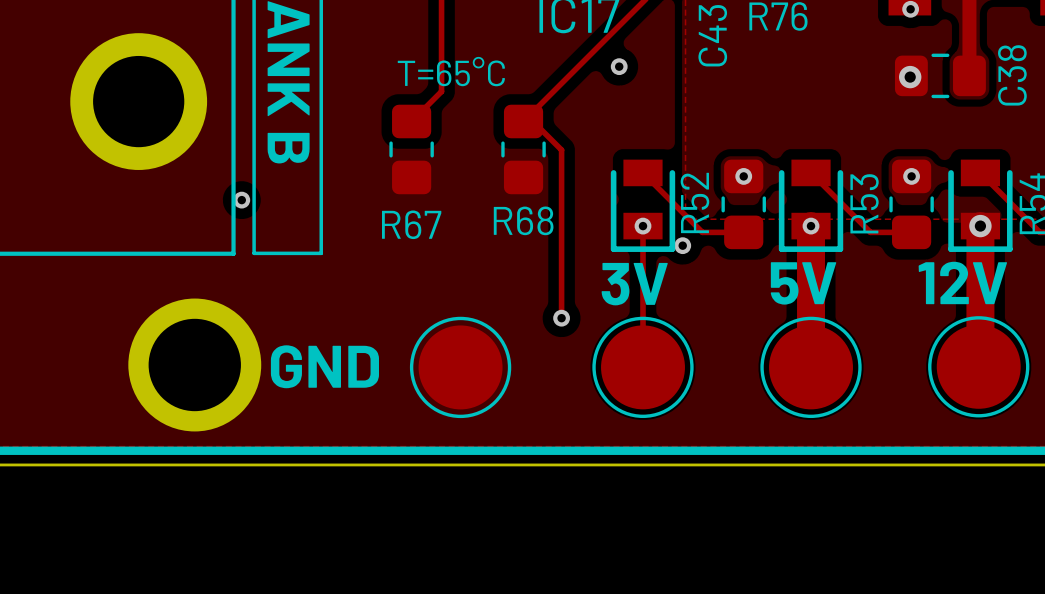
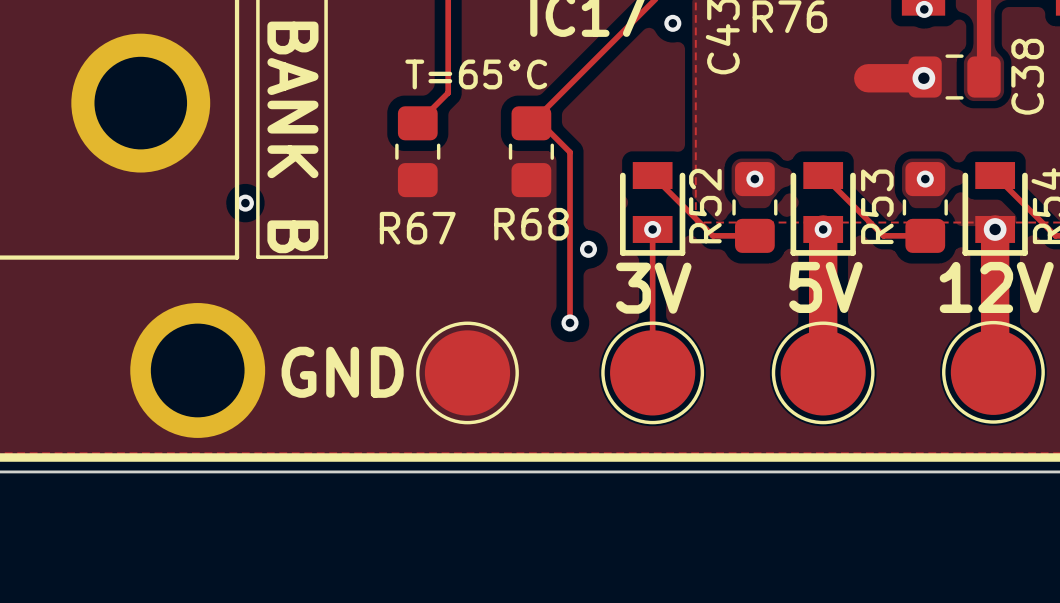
via position: (619, 66) -> (672, 23)
track: none -> (868, 78) (923, 78)
via: none -> (588, 249)
via: (682, 245) -> none

